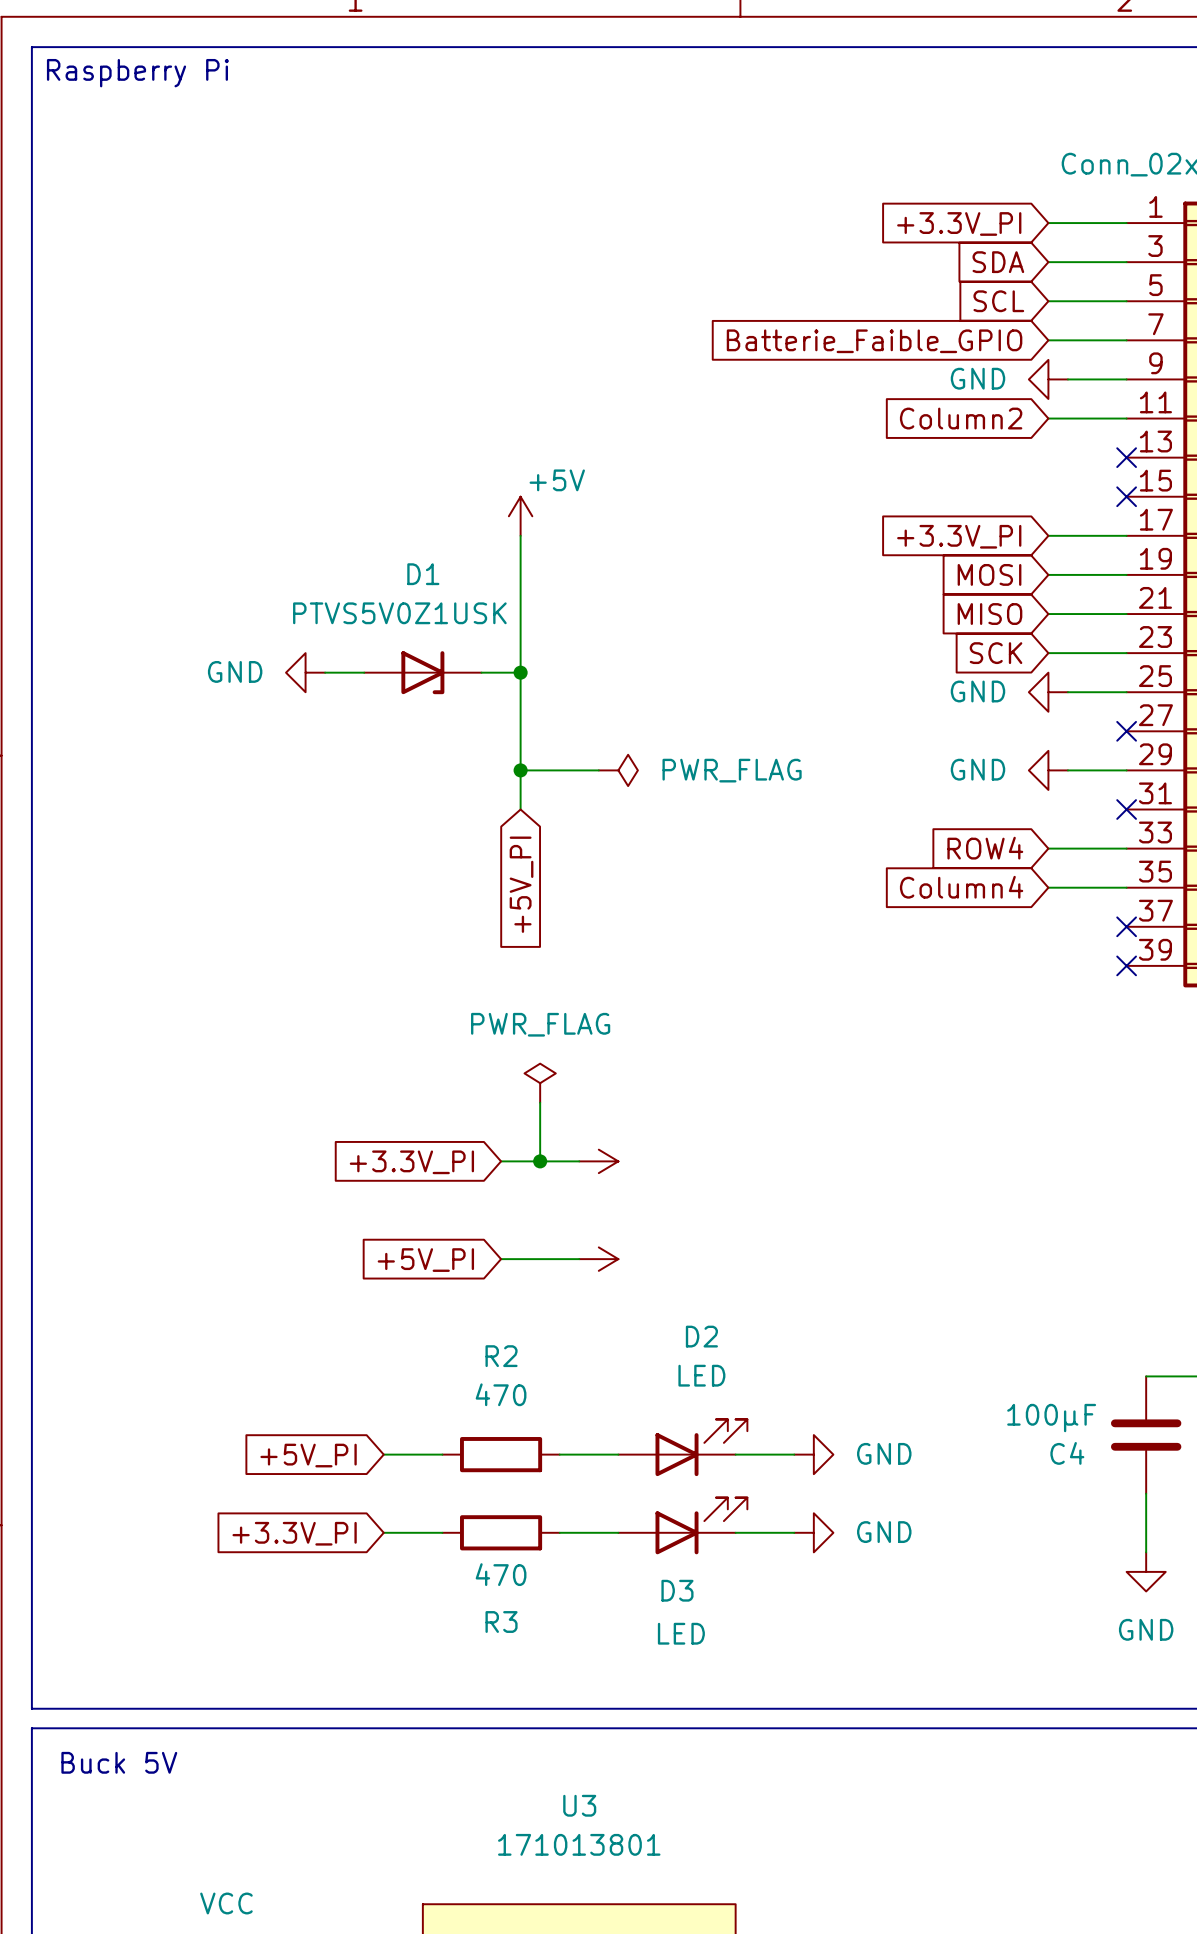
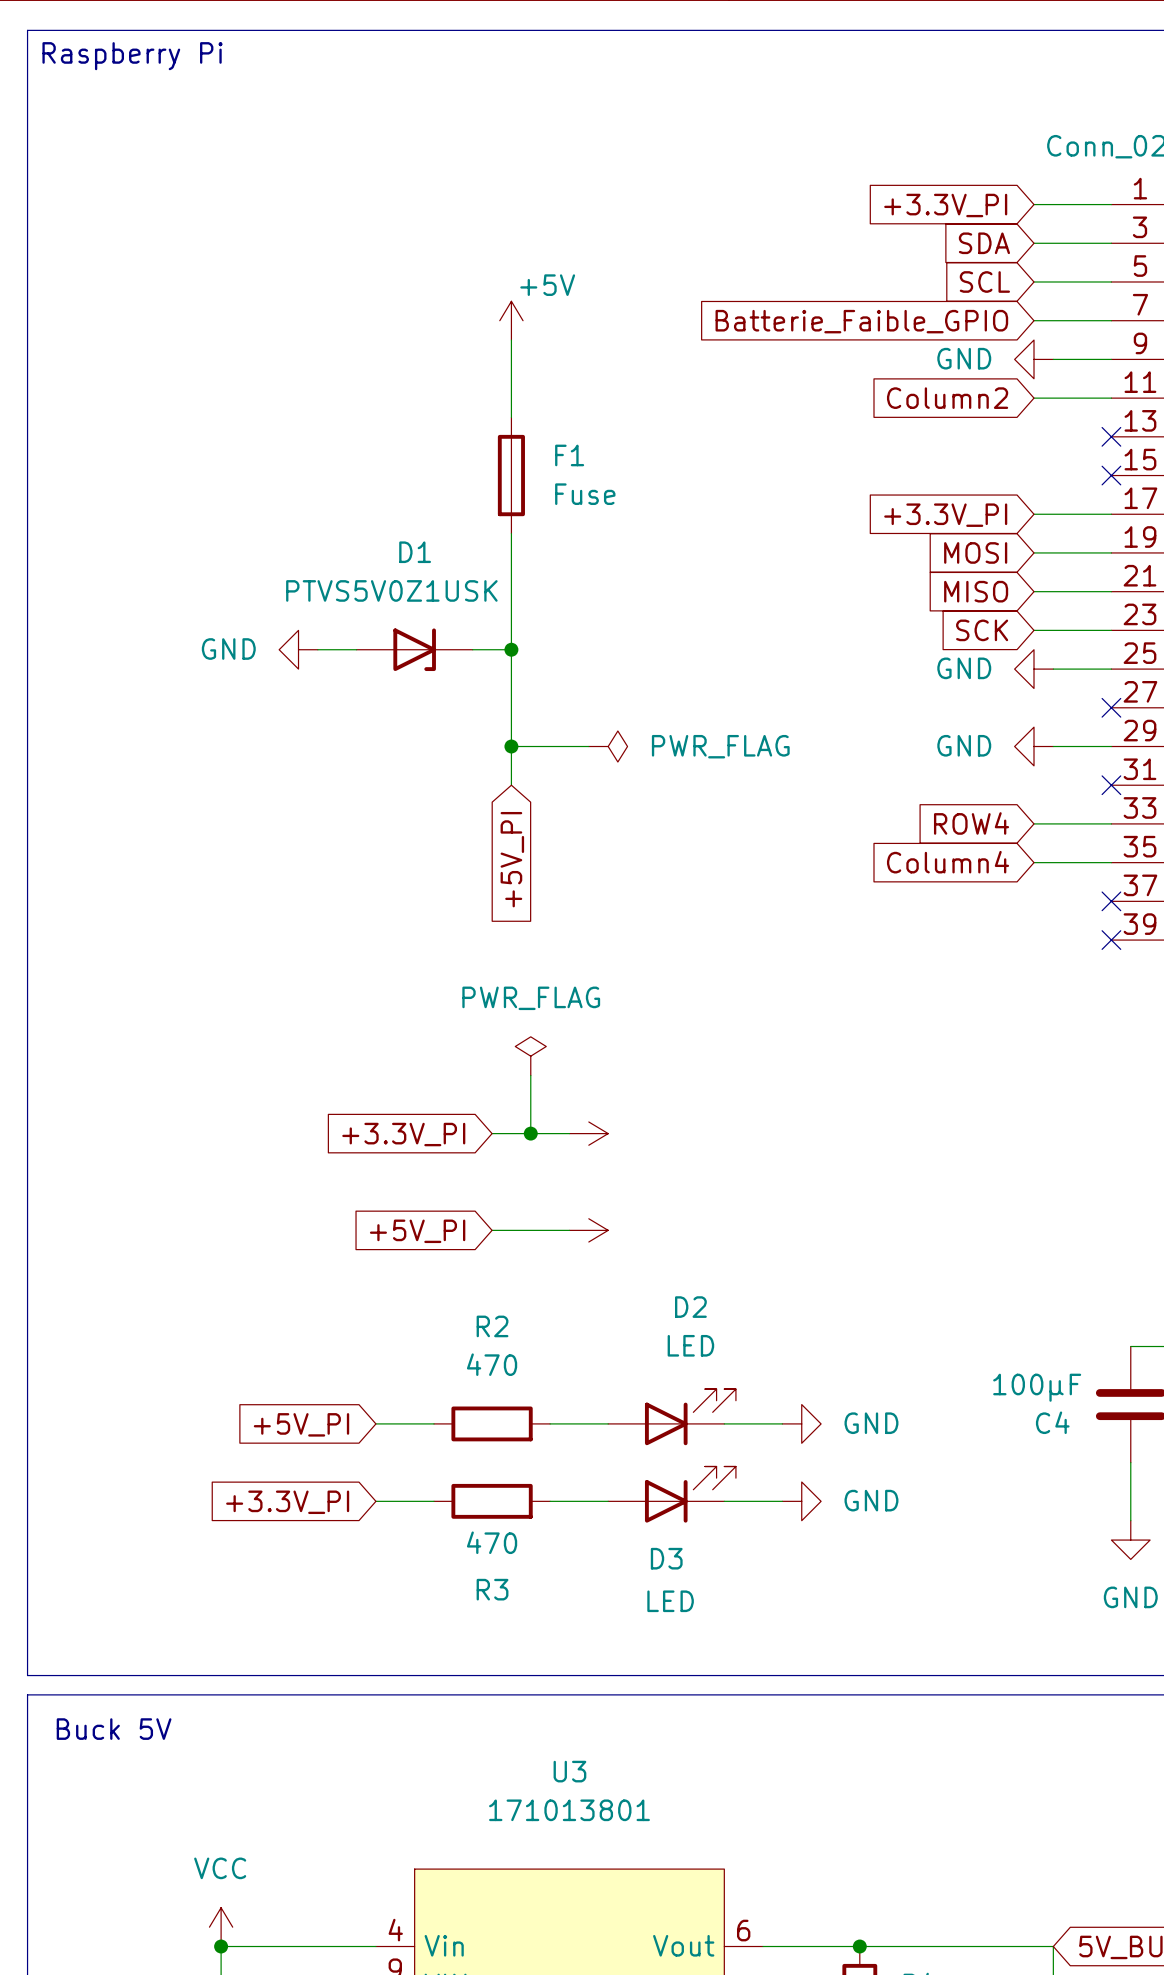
wire: none -> (511, 340) (511, 417)
F1: none -> Fuse (511, 475)
power symbol position: +5V (520, 516) -> +5V (511, 320)

